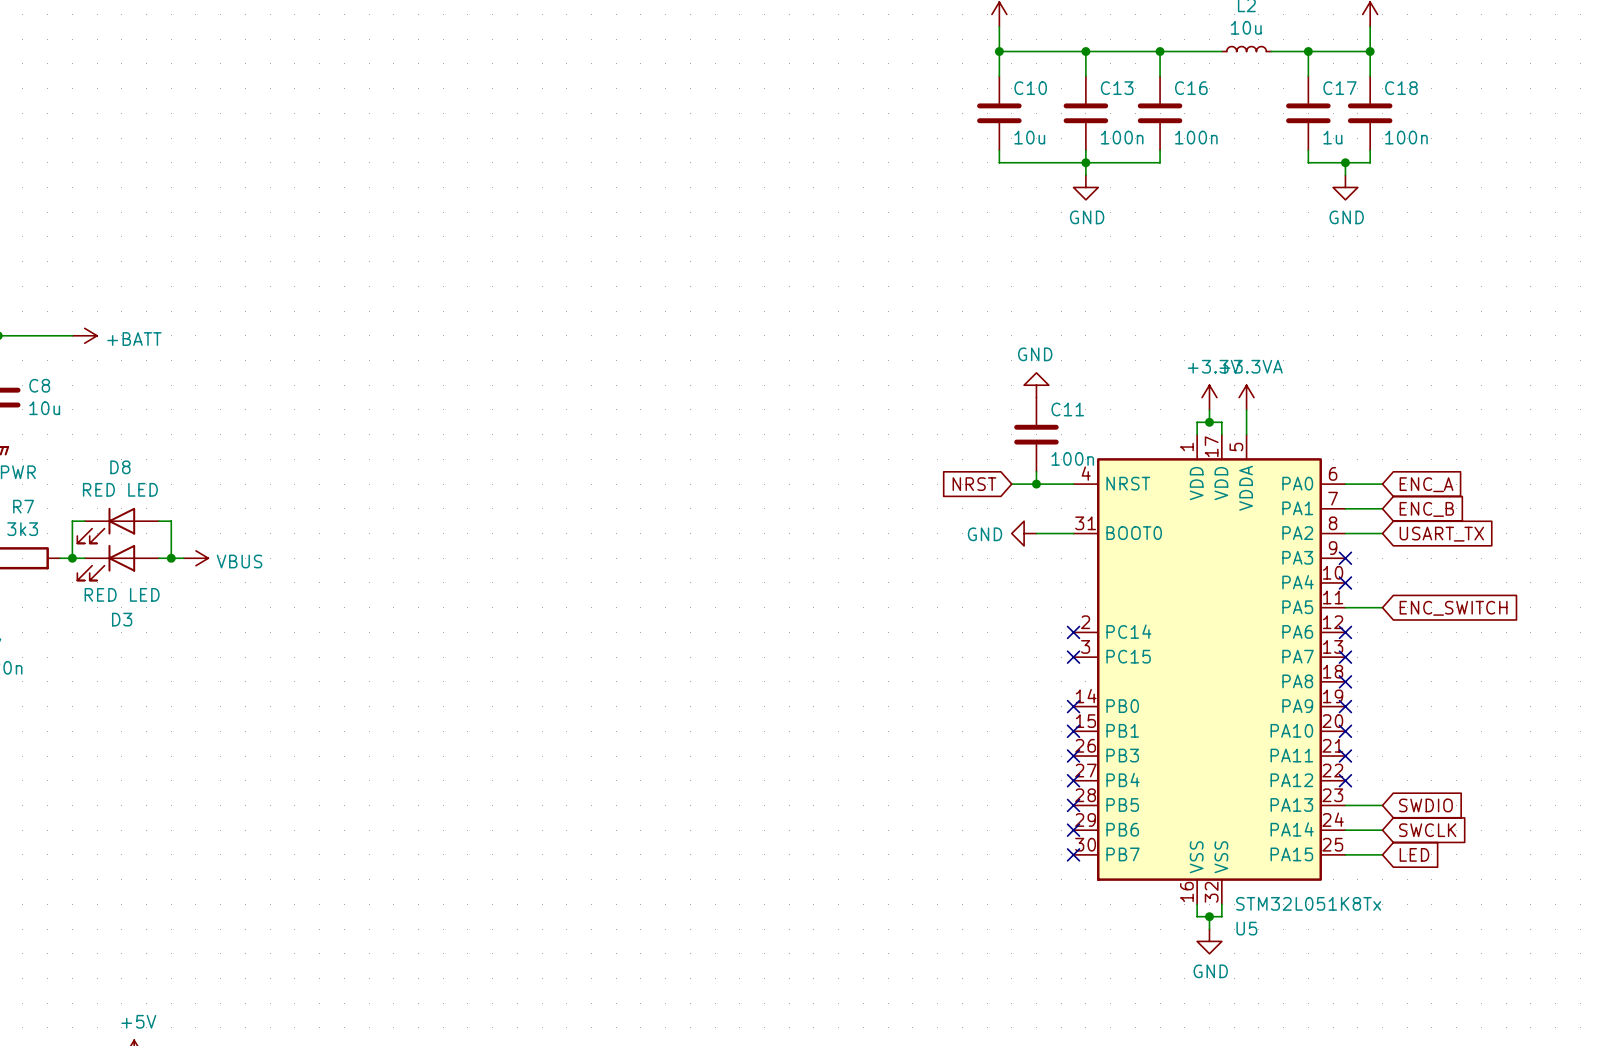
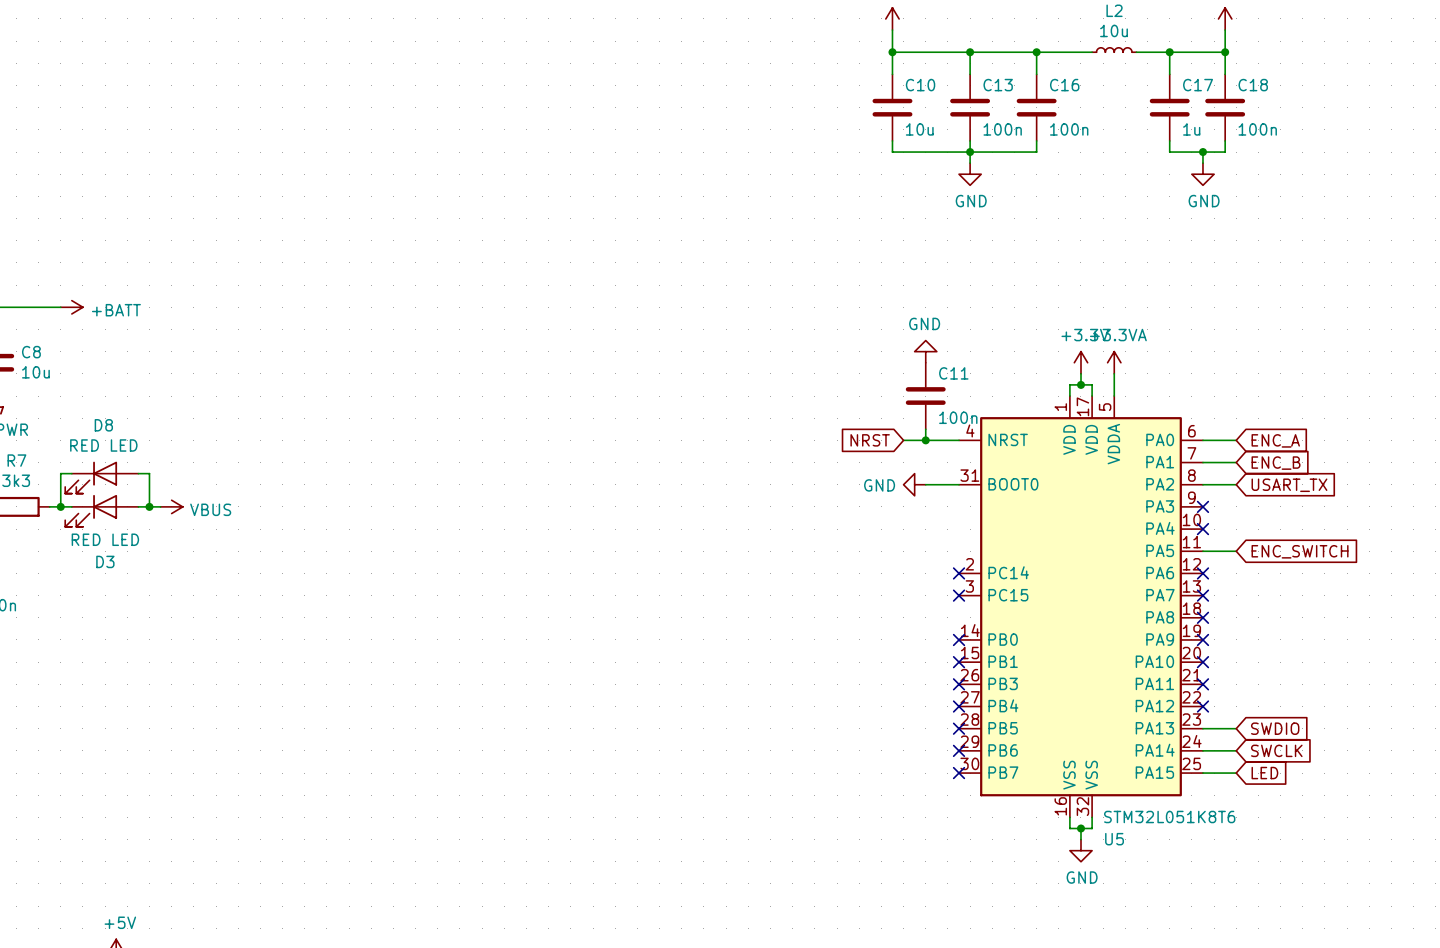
U5 value: STM32L051K8Tx (1308, 903) -> STM32L051K8T6 (1169, 816)

